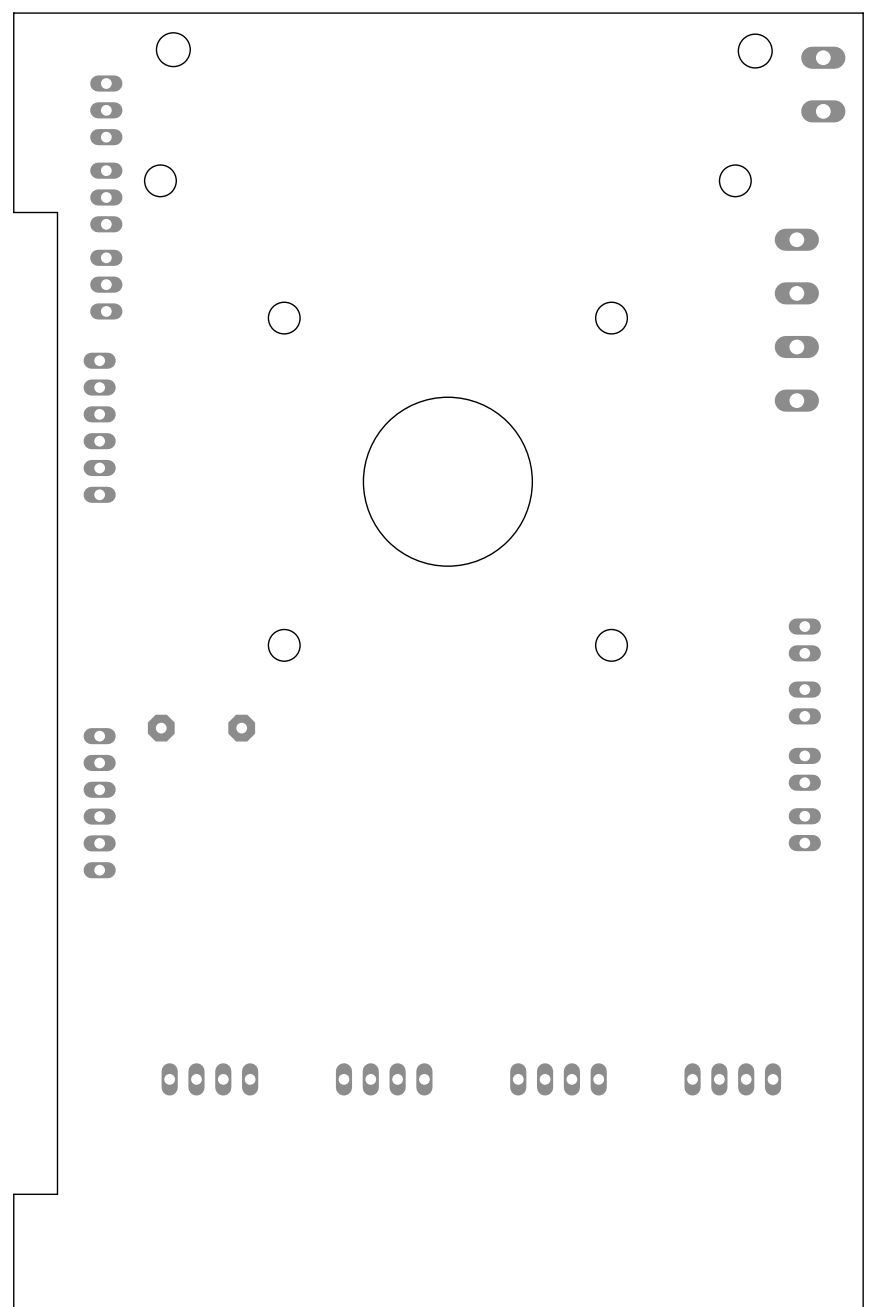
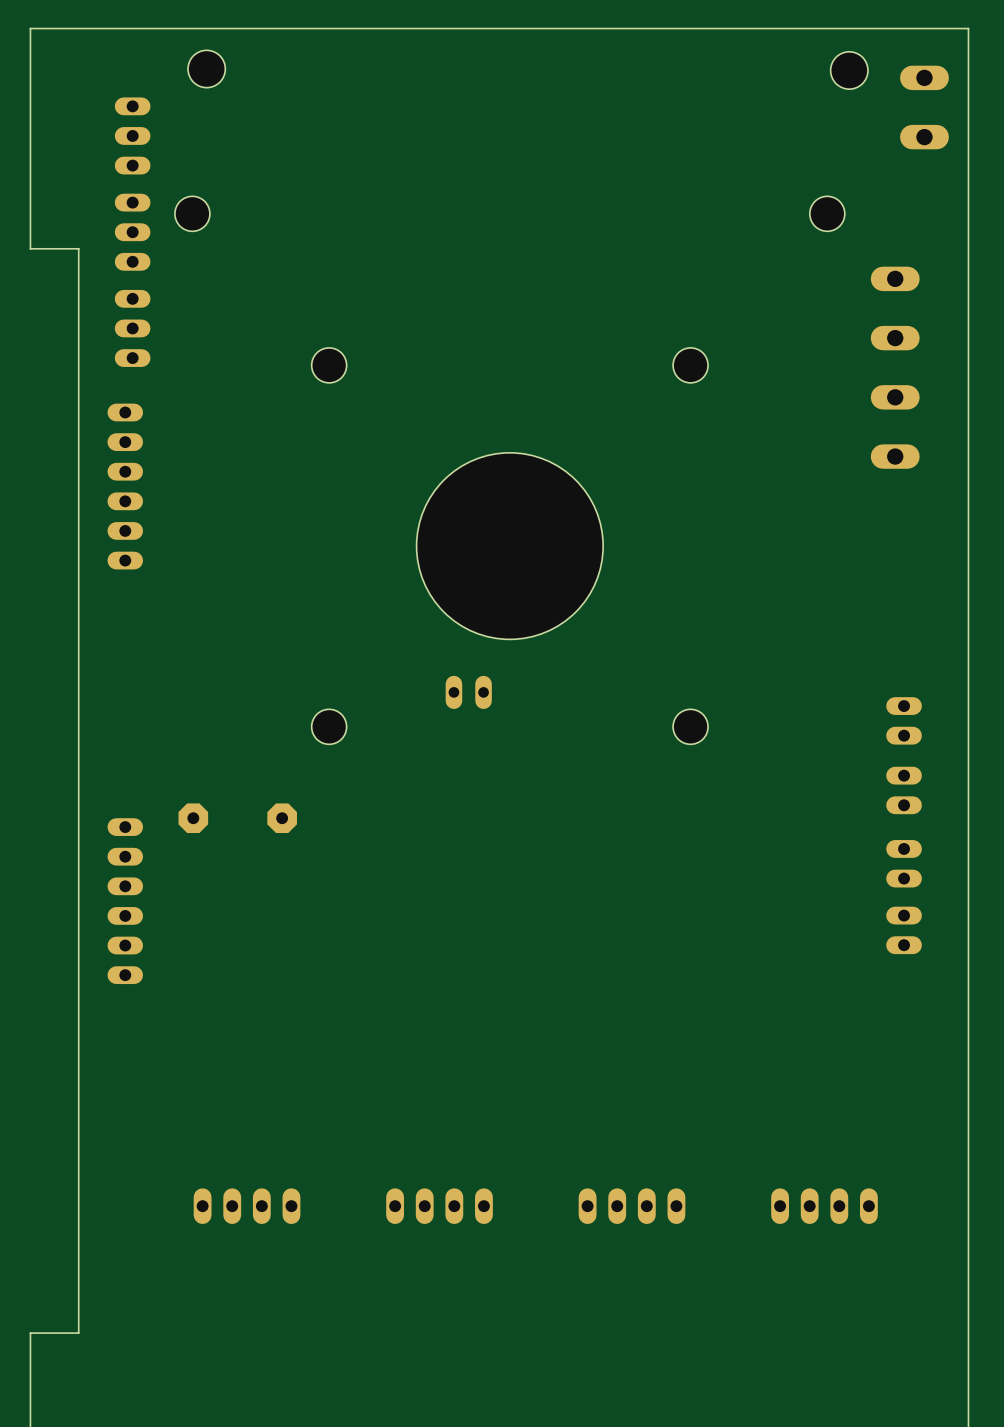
part: none -> (468, 692)

